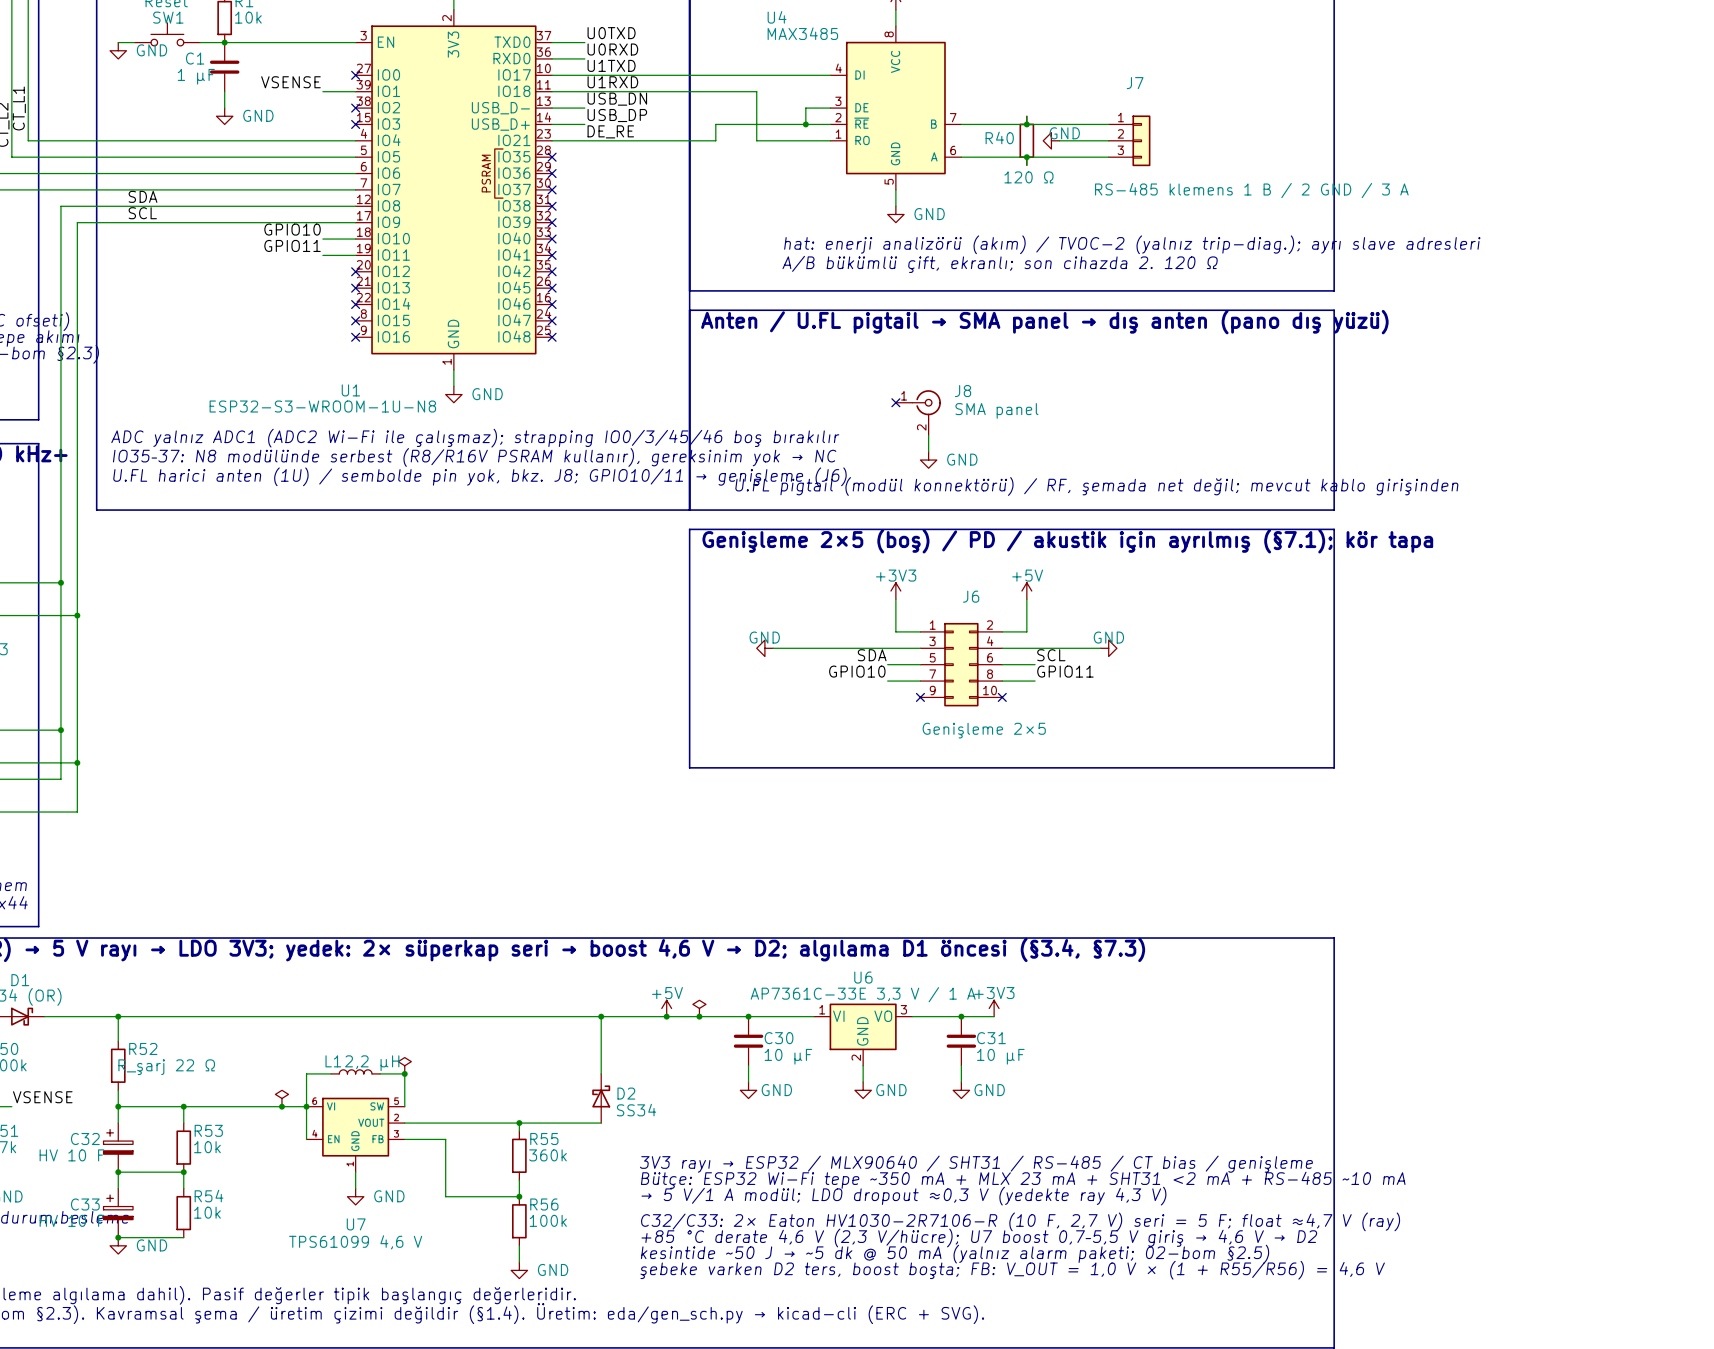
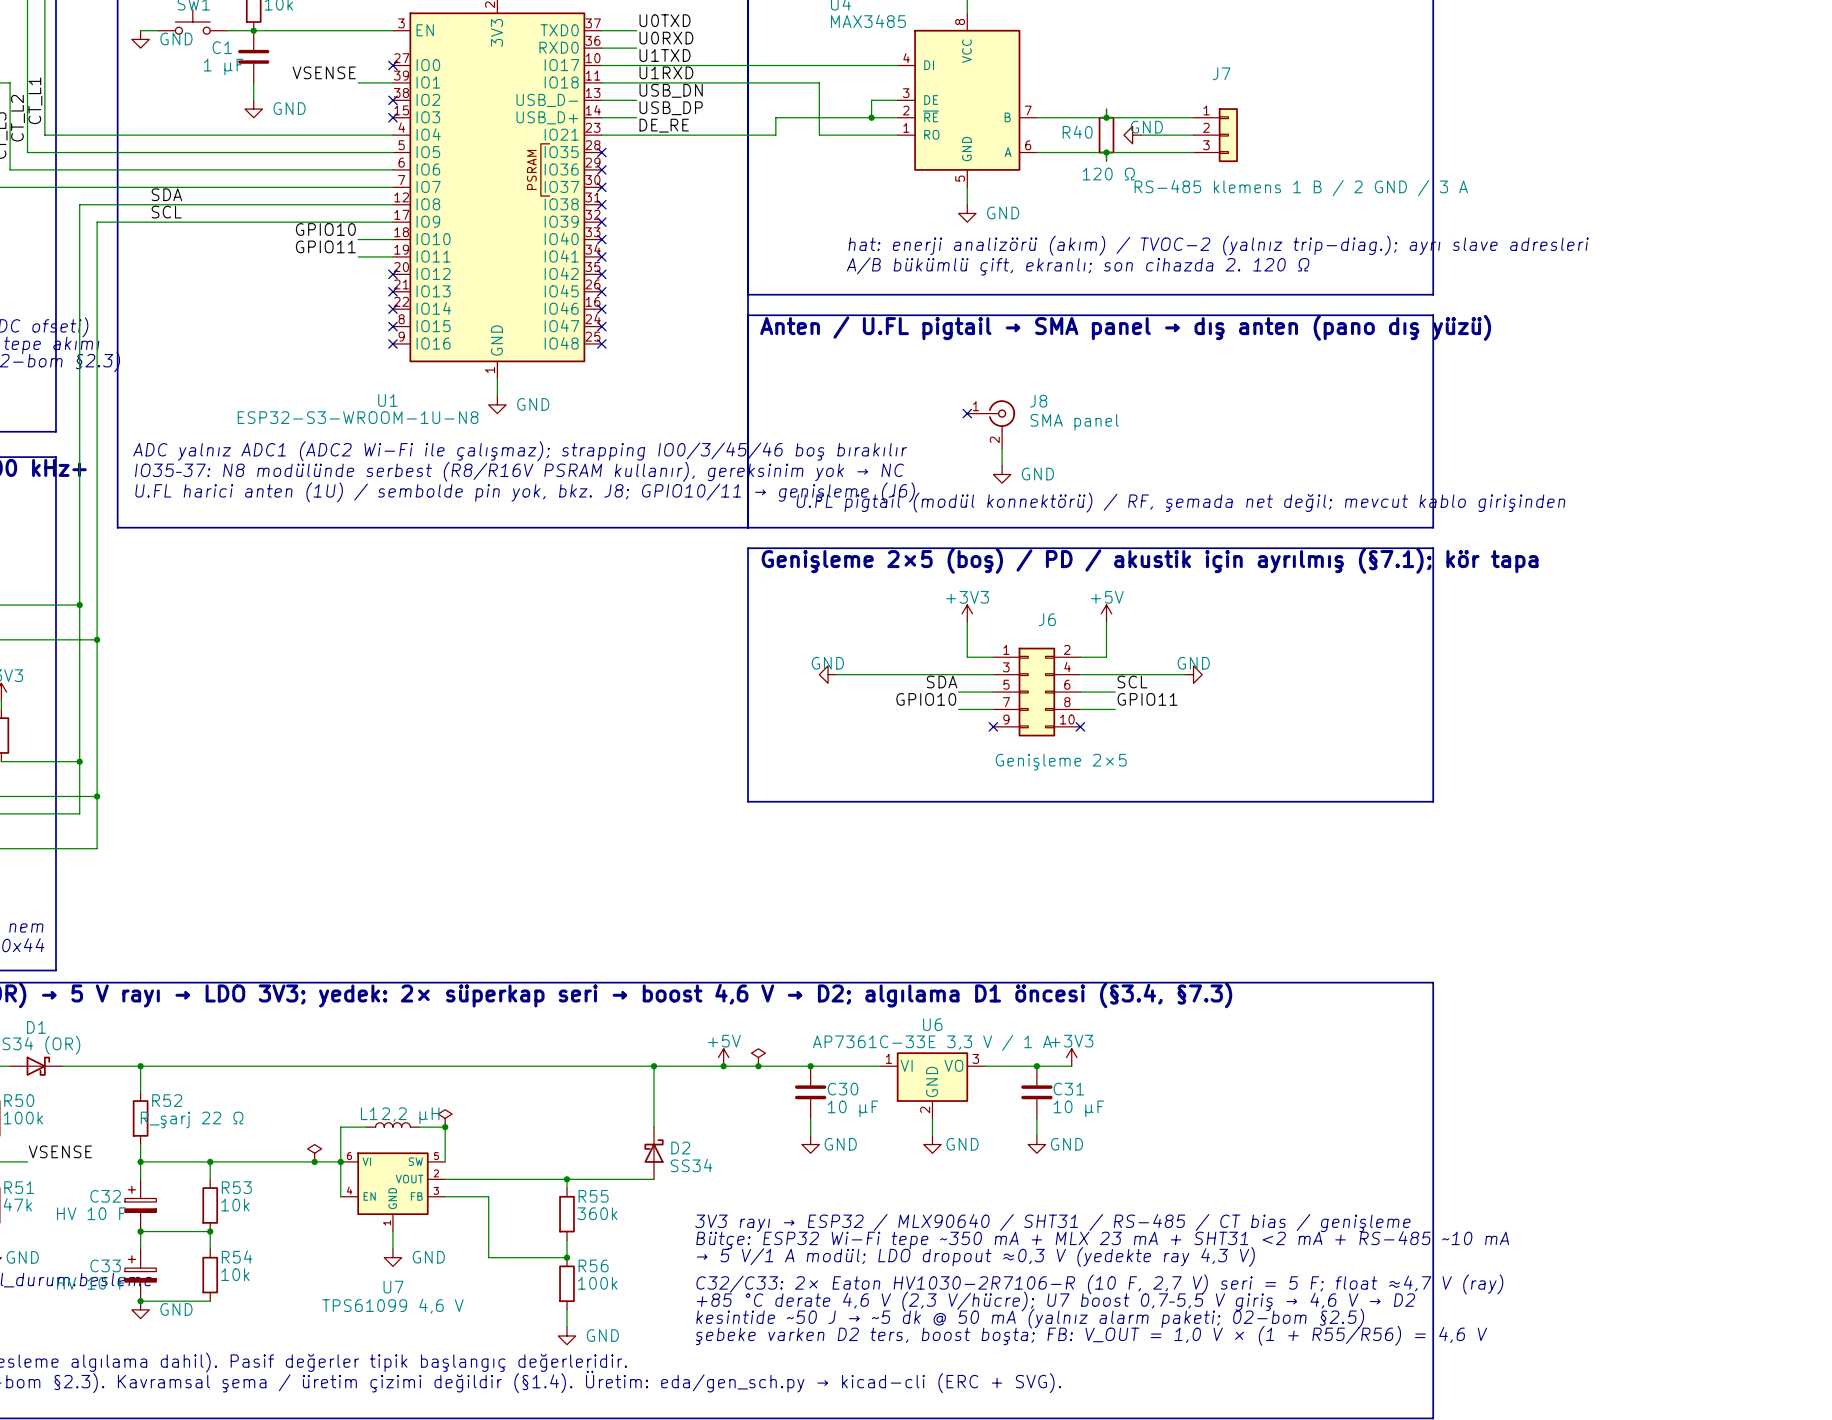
J7 value position: RS-485 klemens 1 B / 2 GND / 3 A (1251, 190) -> RS-485 klemens 1 B / 2 GND / 3 A (1301, 188)

